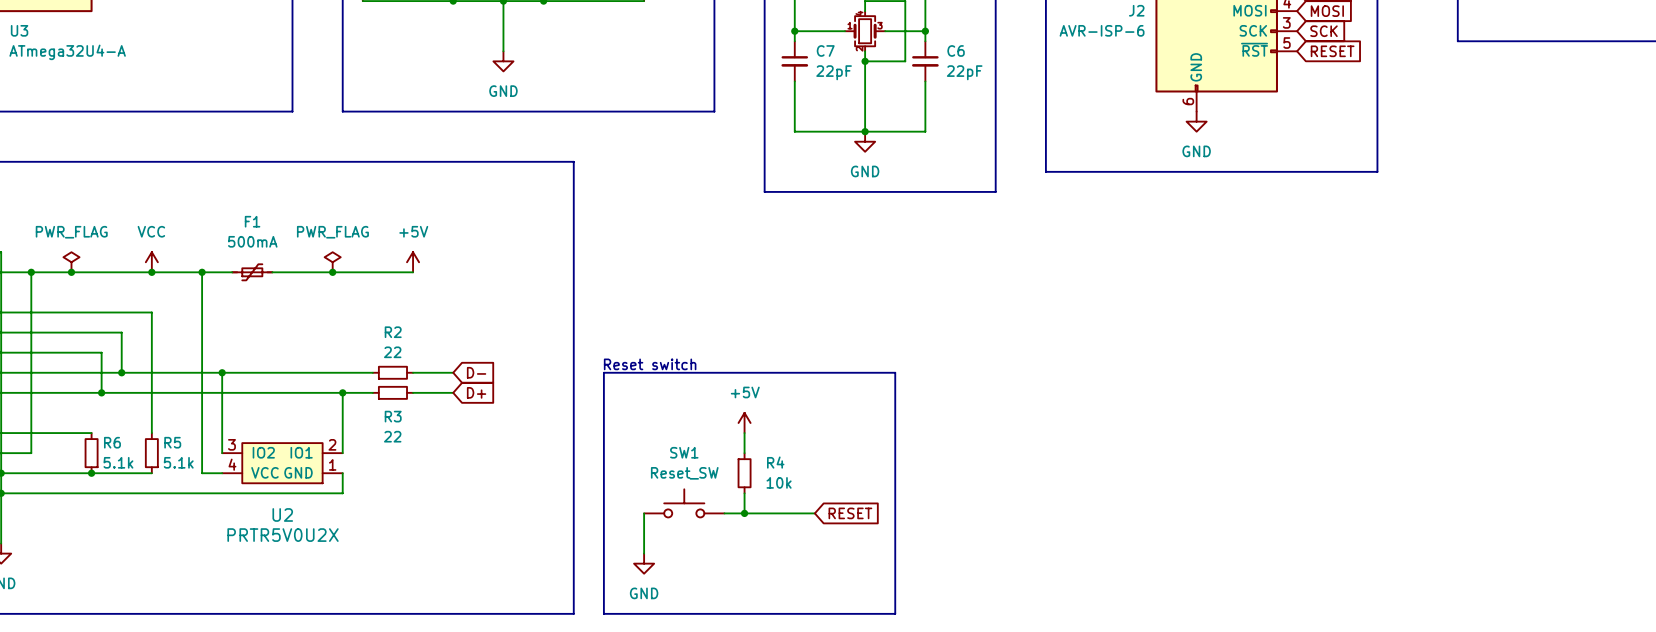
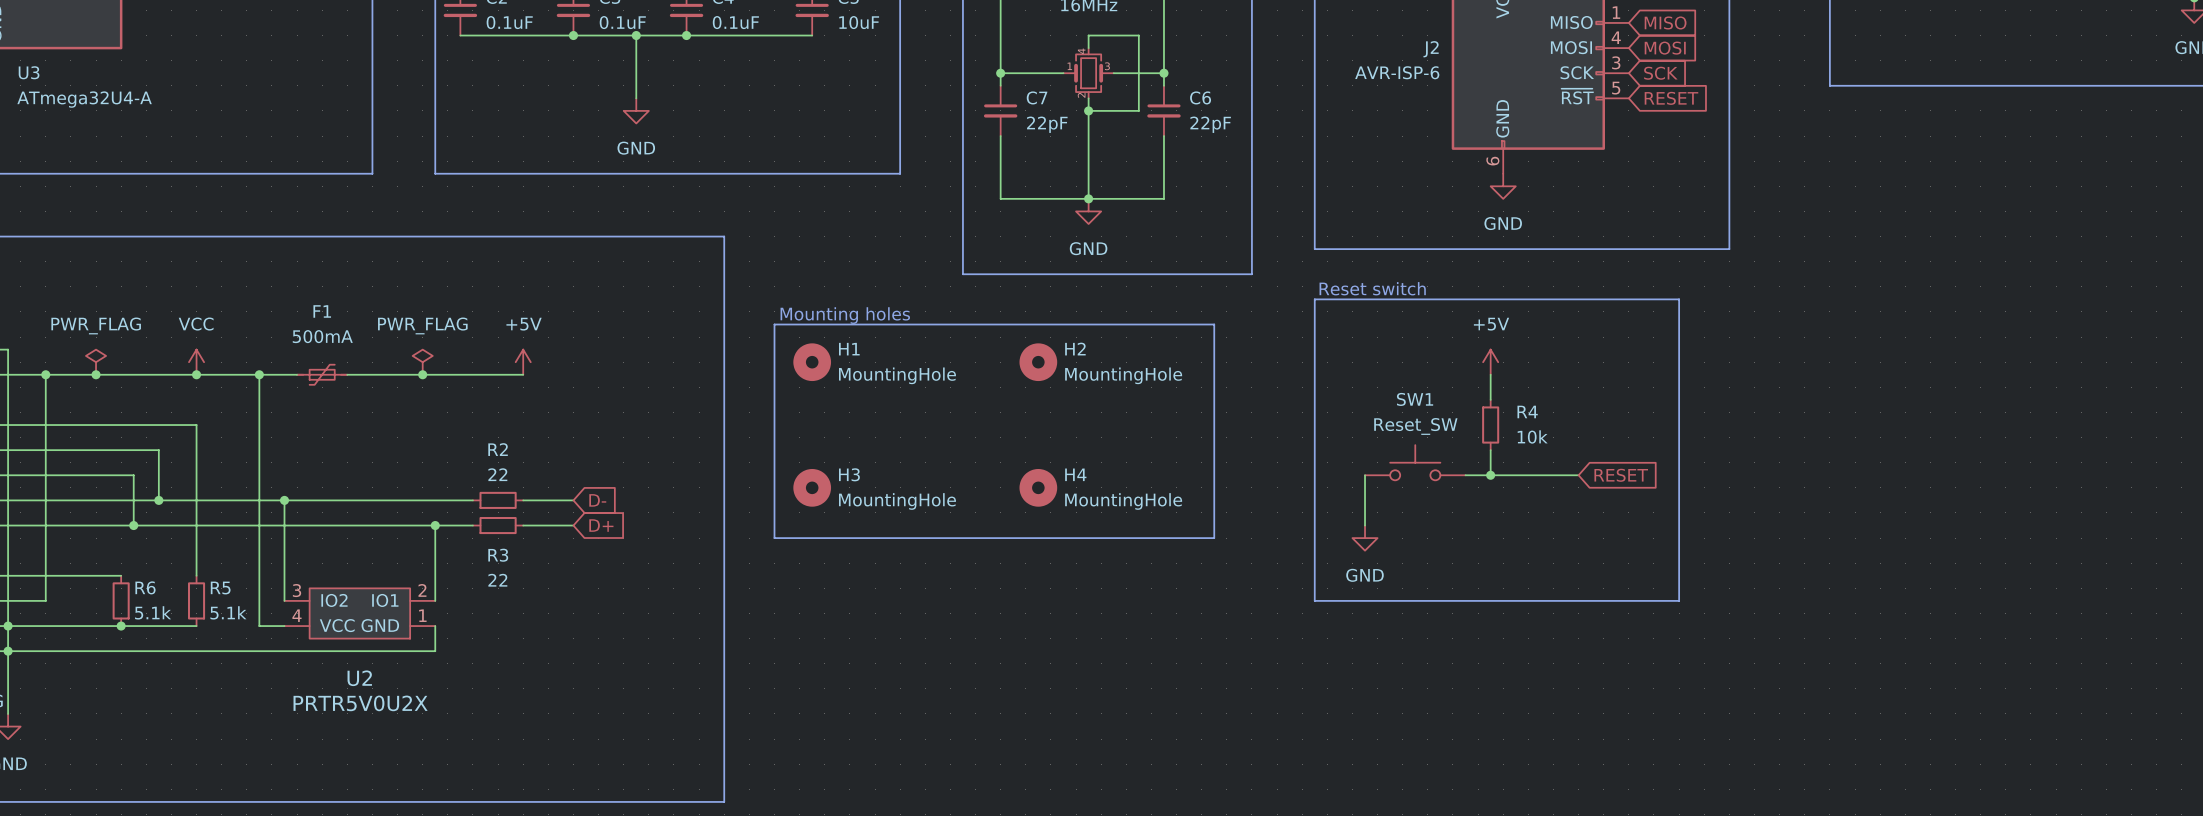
text: none -> Reset switch (1372, 288)
line: none -> (1314, 299) (1679, 299) (1679, 600) (1314, 600) (1314, 299)
text: none -> Mounting holes (845, 315)
line: none -> (774, 324) (1214, 324) (1214, 538) (774, 538) (774, 324)
H1: none -> MountingHole (812, 362)
H2: none -> MountingHole (1038, 362)
power symbol: none -> +5V (1490, 362)
wire: none -> (1490, 374) (1490, 399)
wire: none -> (1490, 450) (1490, 475)
wire: none -> (1365, 475) (1365, 525)
wire: none -> (1465, 475) (1578, 475)
junction: none -> (1490, 475)
global label: none -> RESET (1621, 475)
H3: none -> MountingHole (812, 487)
H4: none -> MountingHole (1038, 487)
text: Reset switch (650, 364) -> none
line: (603, 372) (895, 372) (895, 613) (603, 613) (603, 372) -> none
power symbol: none -> GND (1365, 538)
power symbol: +5V (744, 423) -> none
wire: (744, 433) (744, 453) -> none
R4 position: (744, 473) -> (1490, 425)
wire: (744, 493) (744, 513) -> none
SW1 position: (684, 503) -> (1415, 462)
wire: (644, 513) (644, 553) -> none
wire: (724, 513) (814, 513) -> none
junction: (744, 513) -> none
global label: RESET (850, 513) -> none
power symbol: GND (644, 563) -> none

